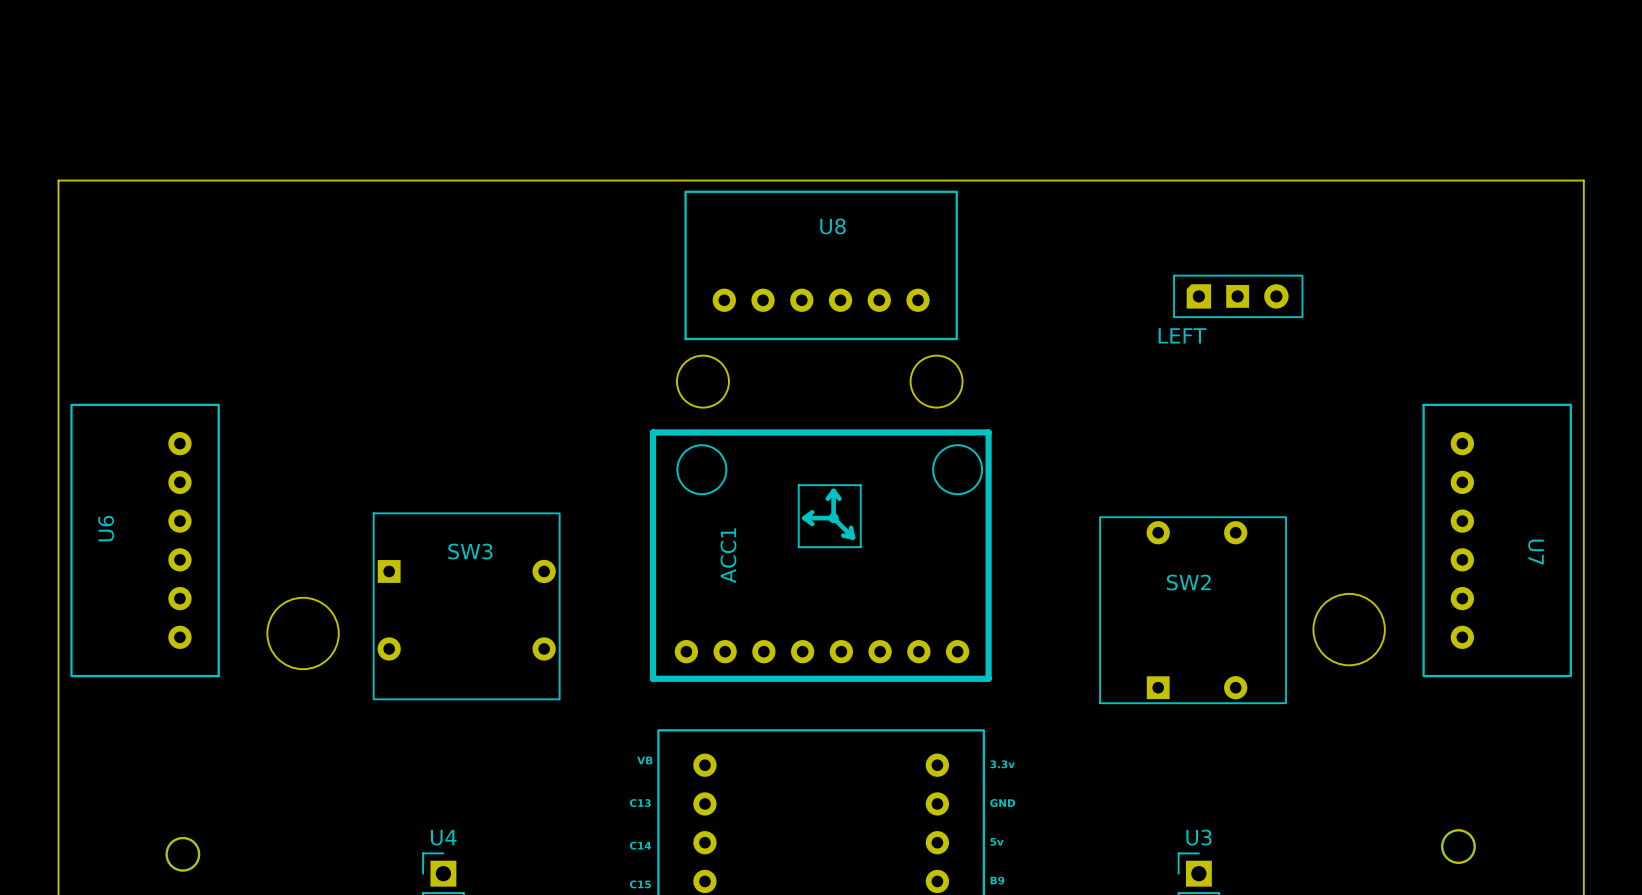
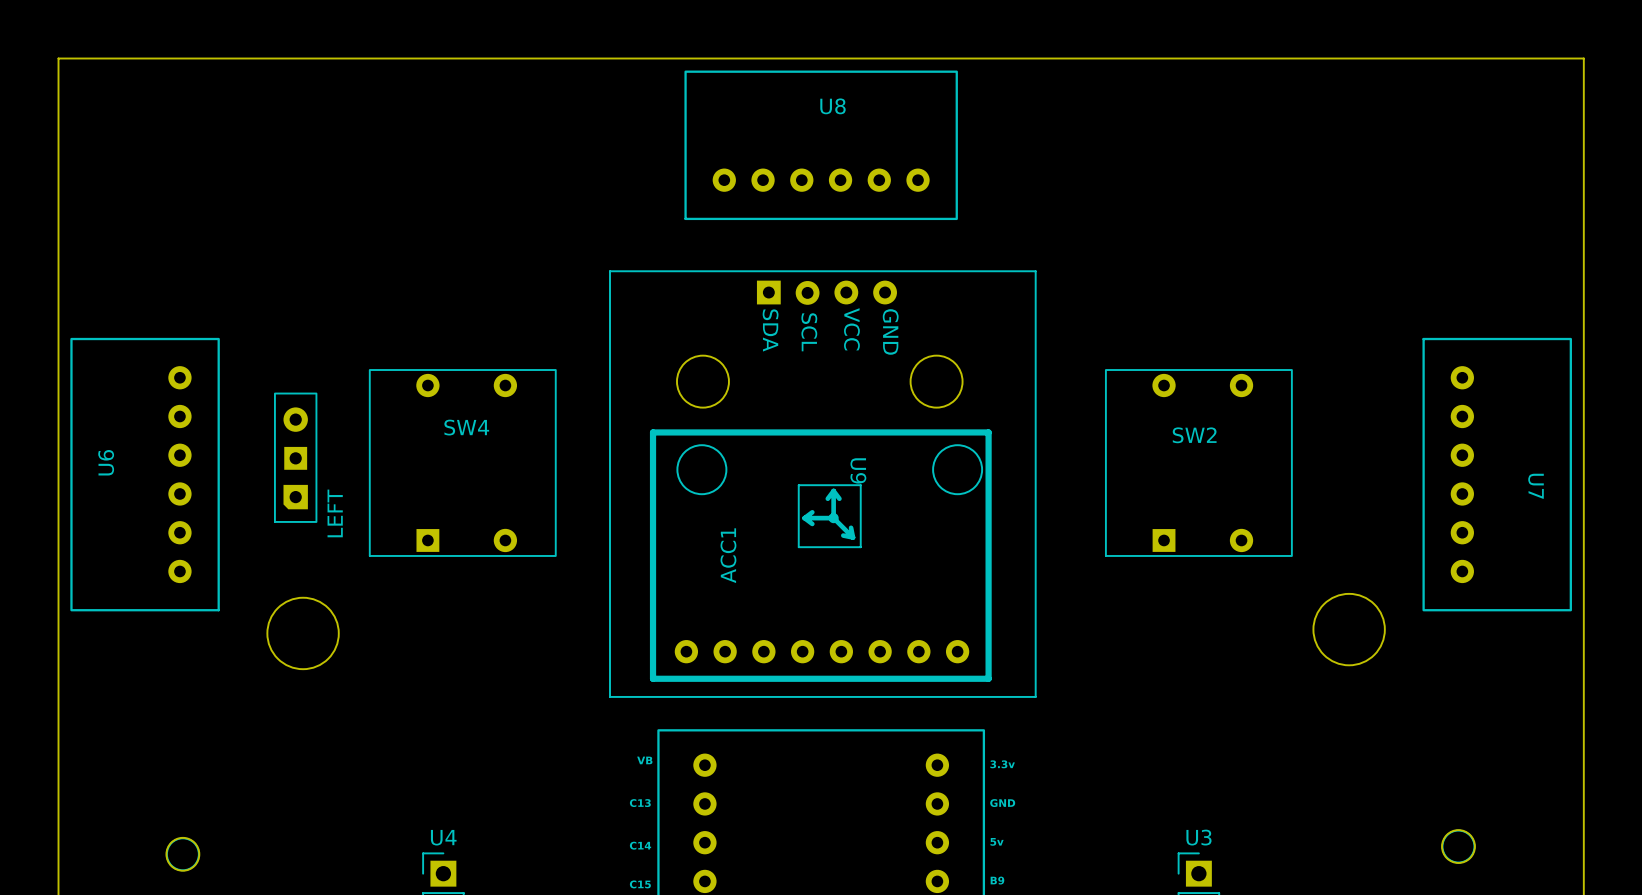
board edge: (58, 180) (1583, 180) -> (58, 180) (58, 58) (1583, 58) (1583, 180)
U8 position: (821, 265) -> (821, 145)
part: (1238, 296) -> none
part: none -> (295, 457)
SW4: none -> (462, 462)
U9: none -> (822, 484)
U6 position: (145, 540) -> (145, 474)
U7 position: (1497, 540) -> (1497, 474)
SW3: (466, 606) -> none
SW2 position: (1193, 610) -> (1198, 462)

